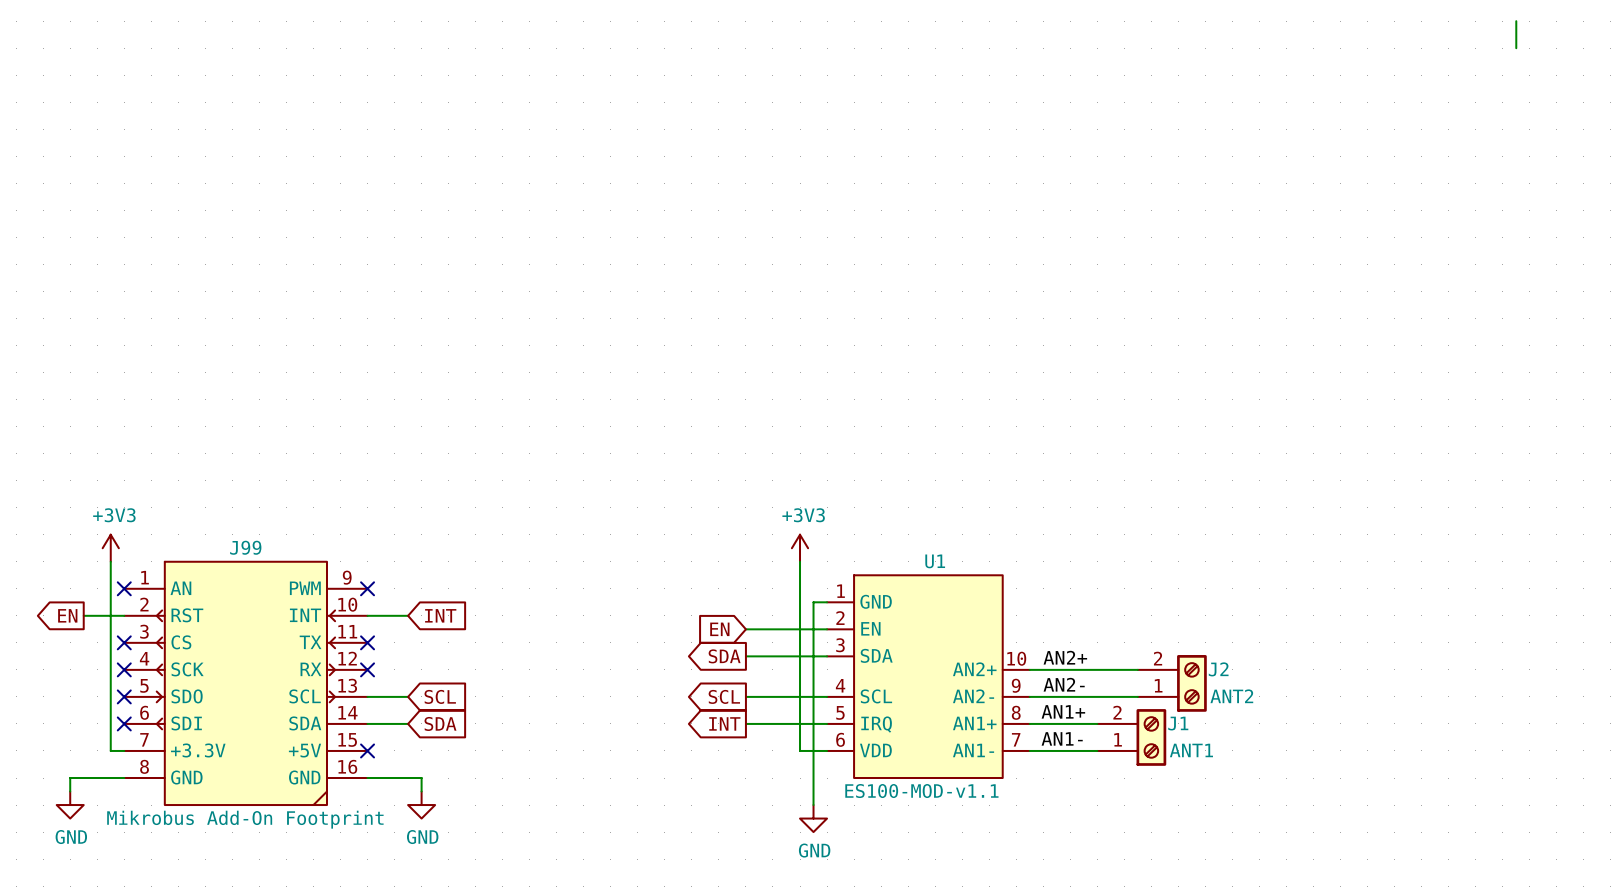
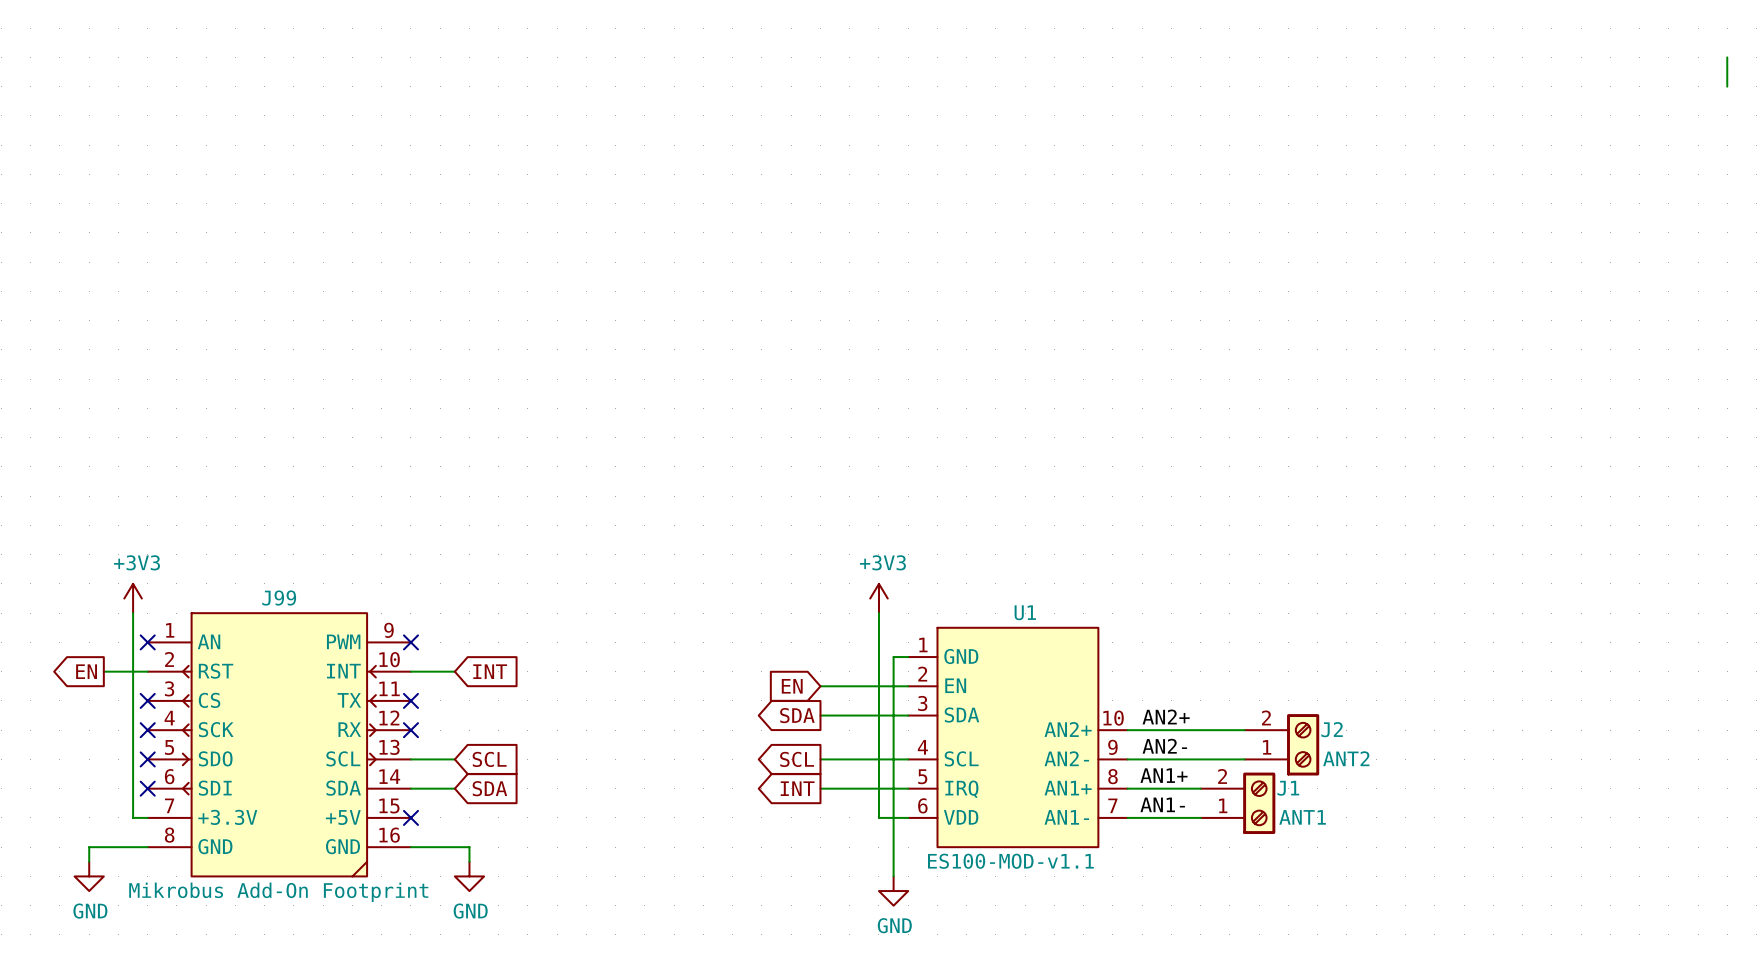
wire: (1516, 21) (1516, 48) -> (1727, 57) (1727, 86)

